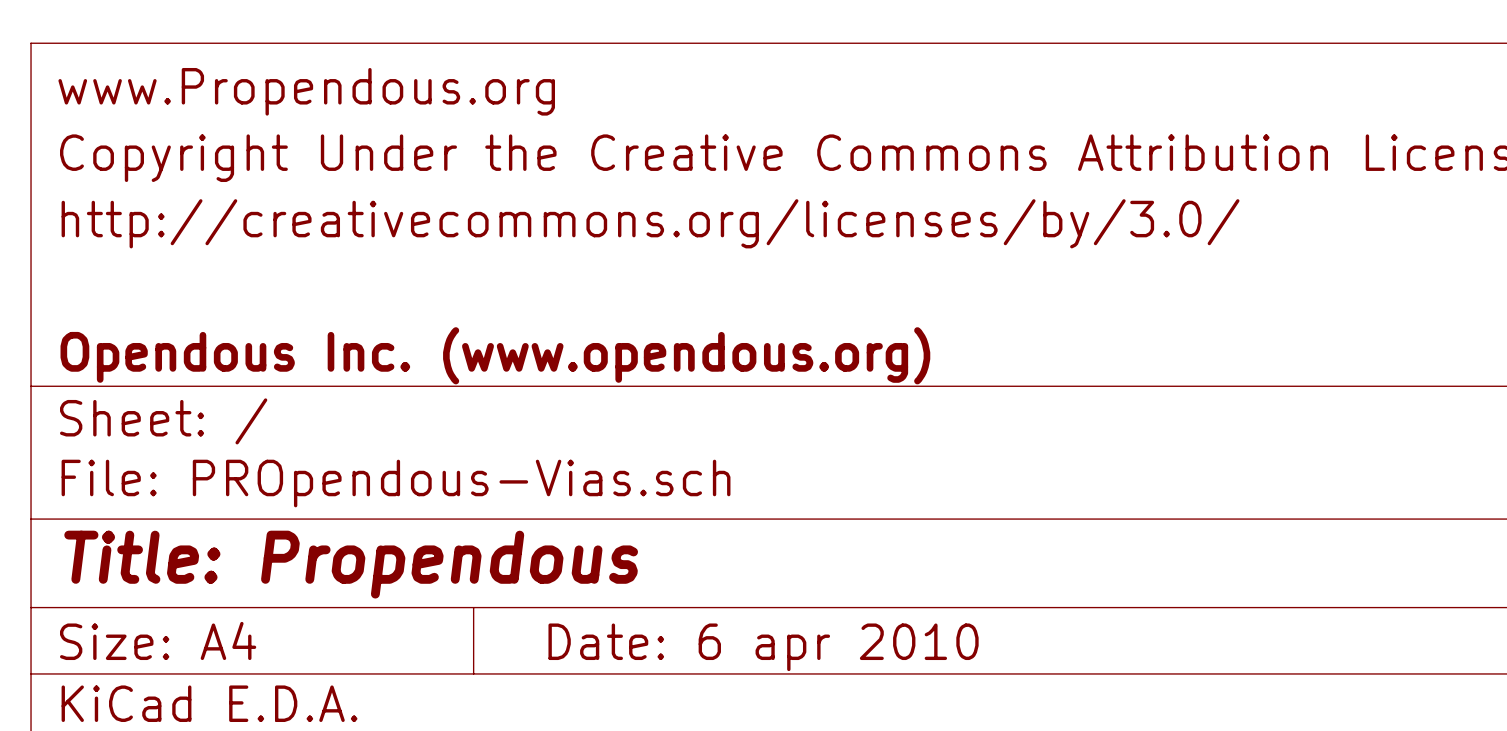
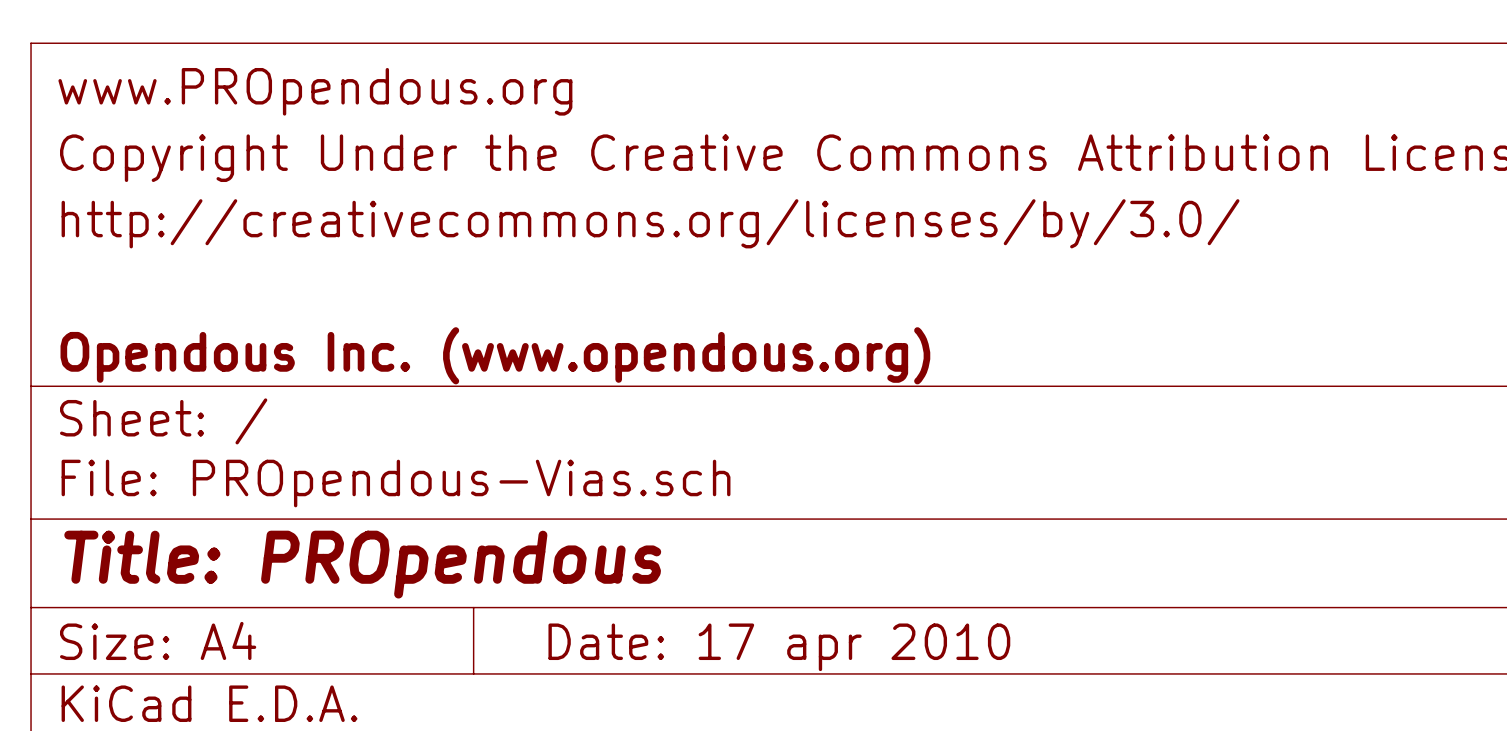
title block: www.Propendous.org (306, 91) -> www.PROpendous.org (315, 91)
title block: Title: Propendous (351, 564) -> Title: PROpendous (362, 564)
title block: Date: 6 apr 2010 (763, 647) -> Date: 17 apr 2010 (779, 647)

